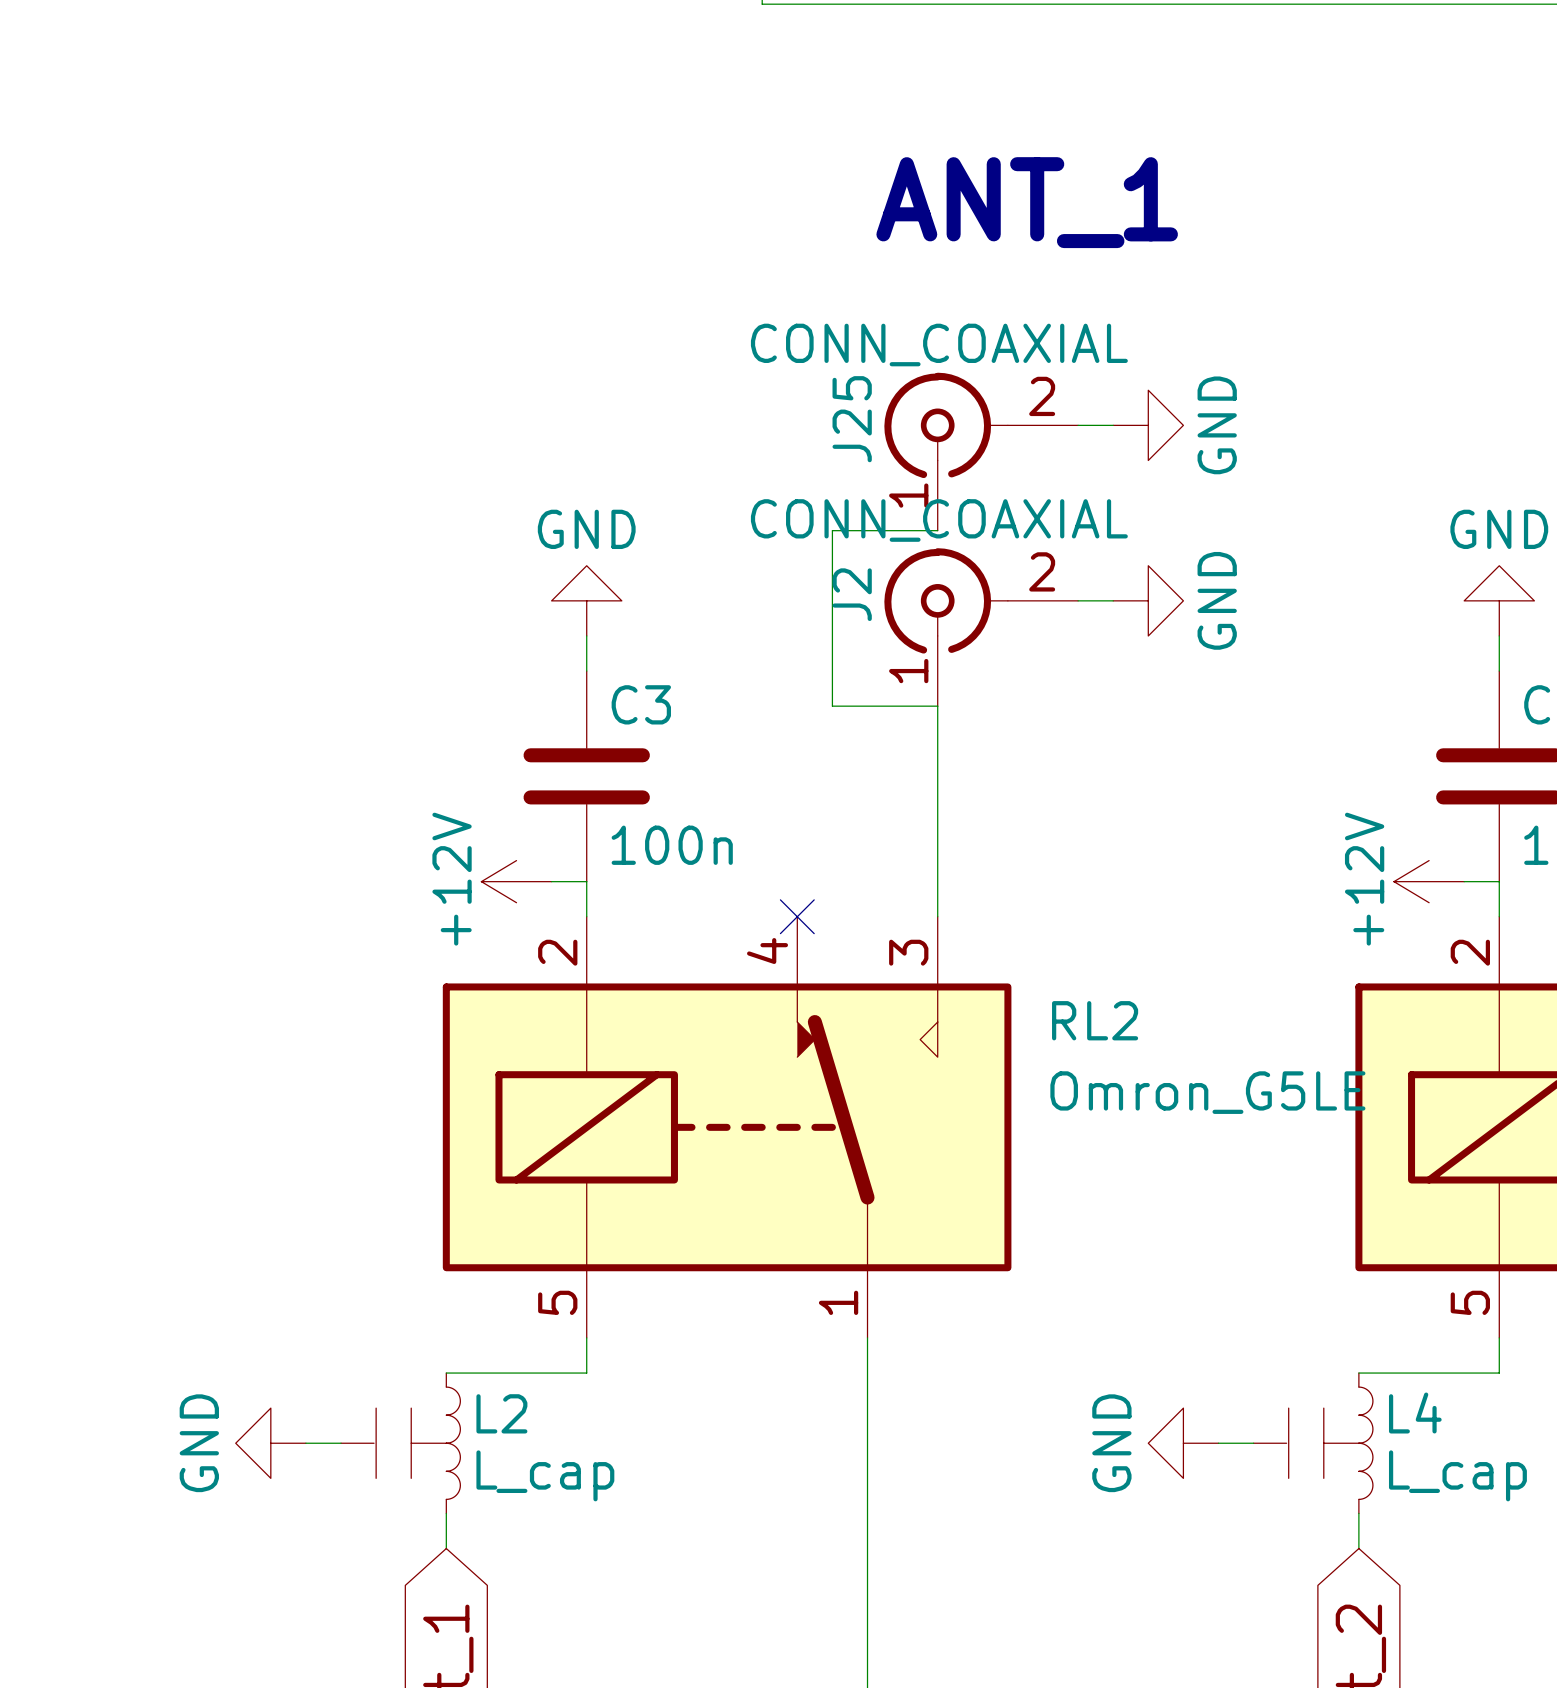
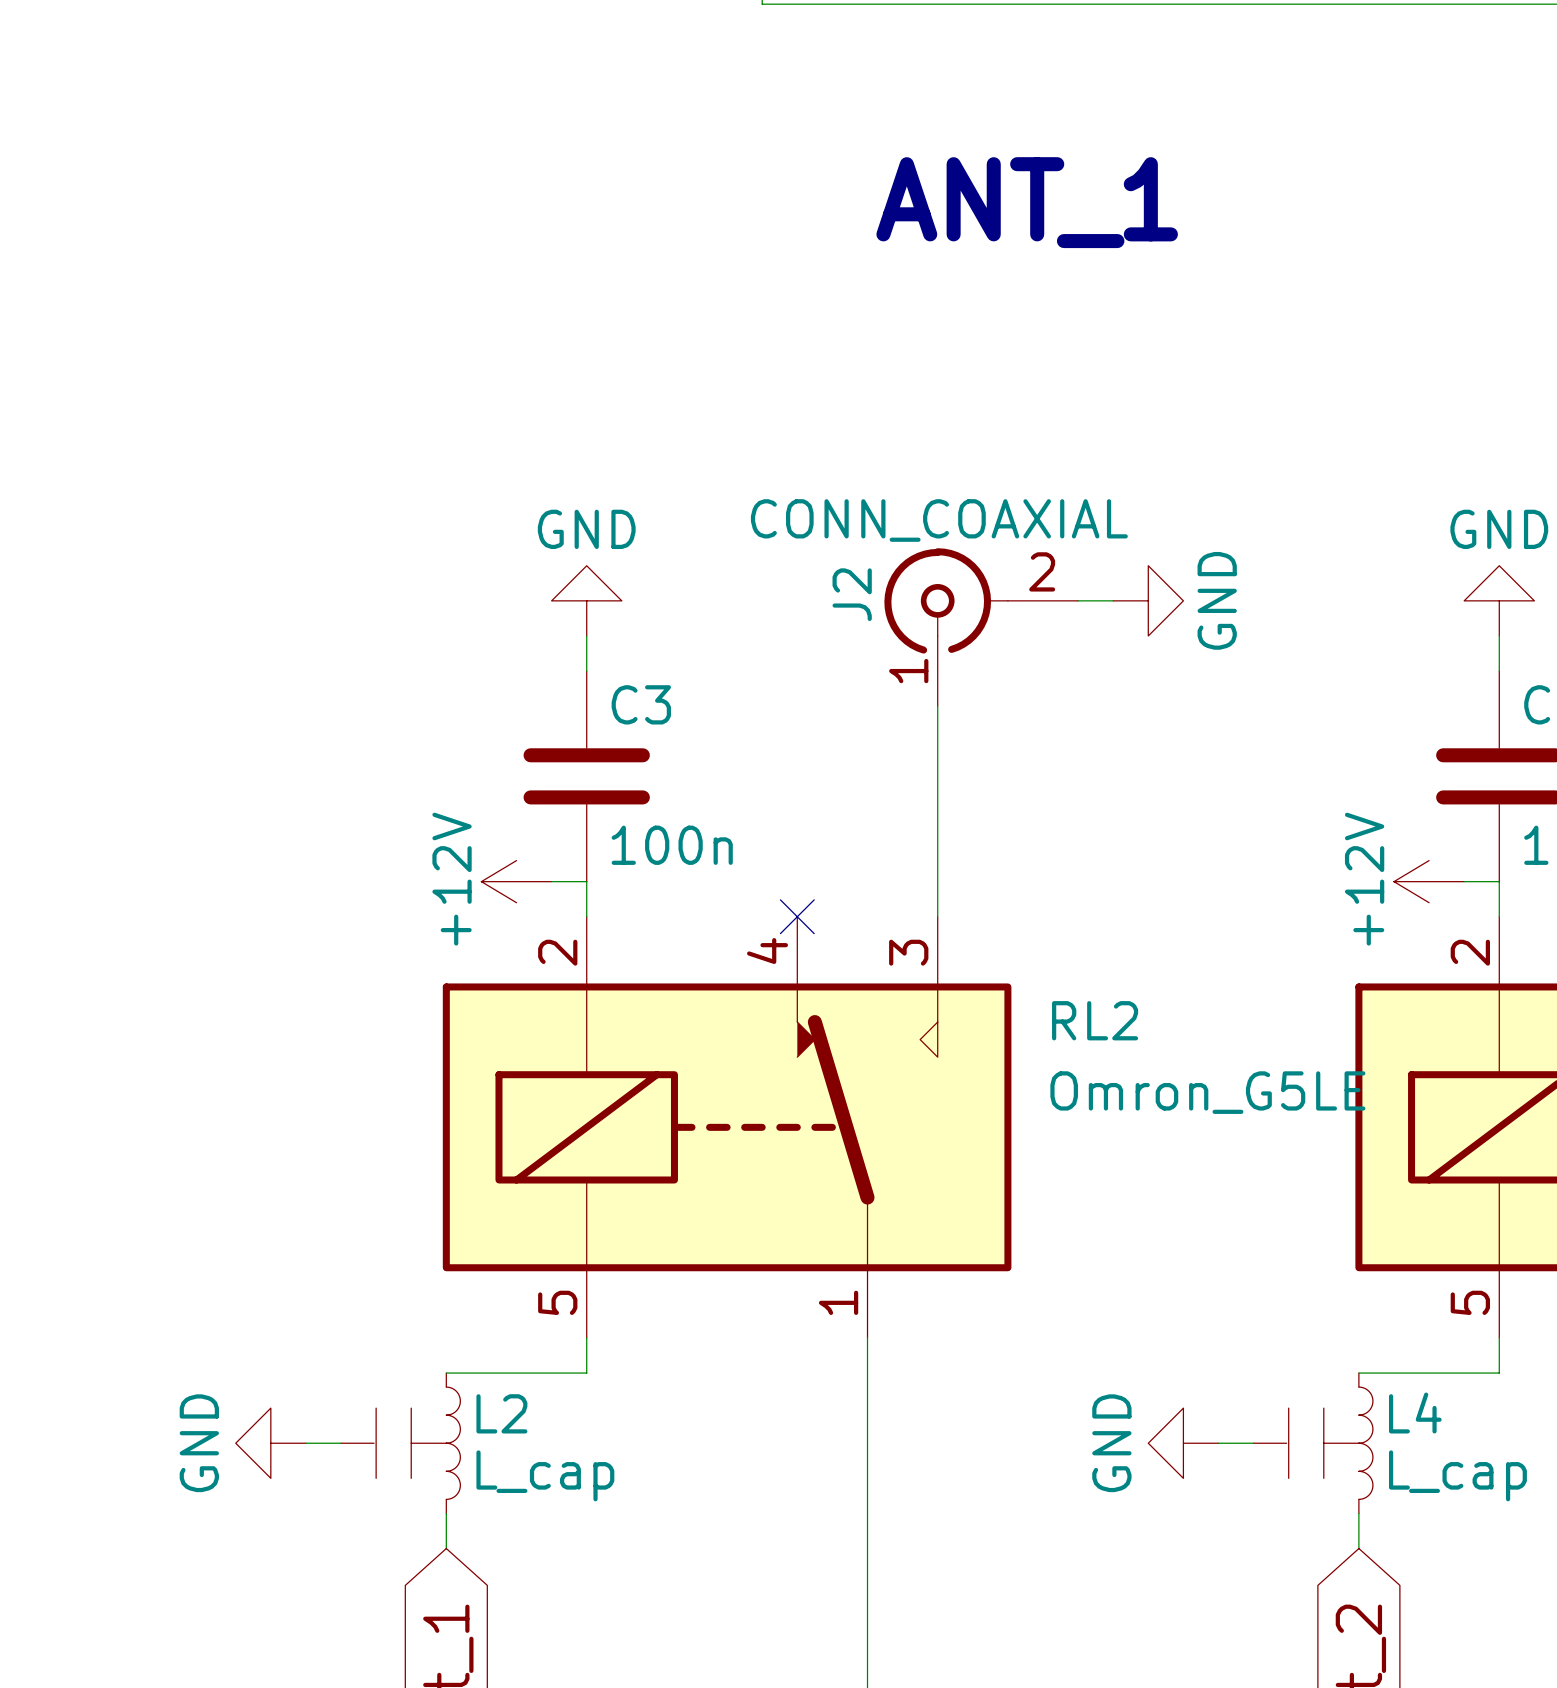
wire: (1078, 425) (1113, 425) -> none
power symbol: GND (1148, 425) -> none
J25: CONN_COAXIAL (981, 451) -> none
wire: (937, 530) (832, 530) (832, 706) (937, 706) -> none

